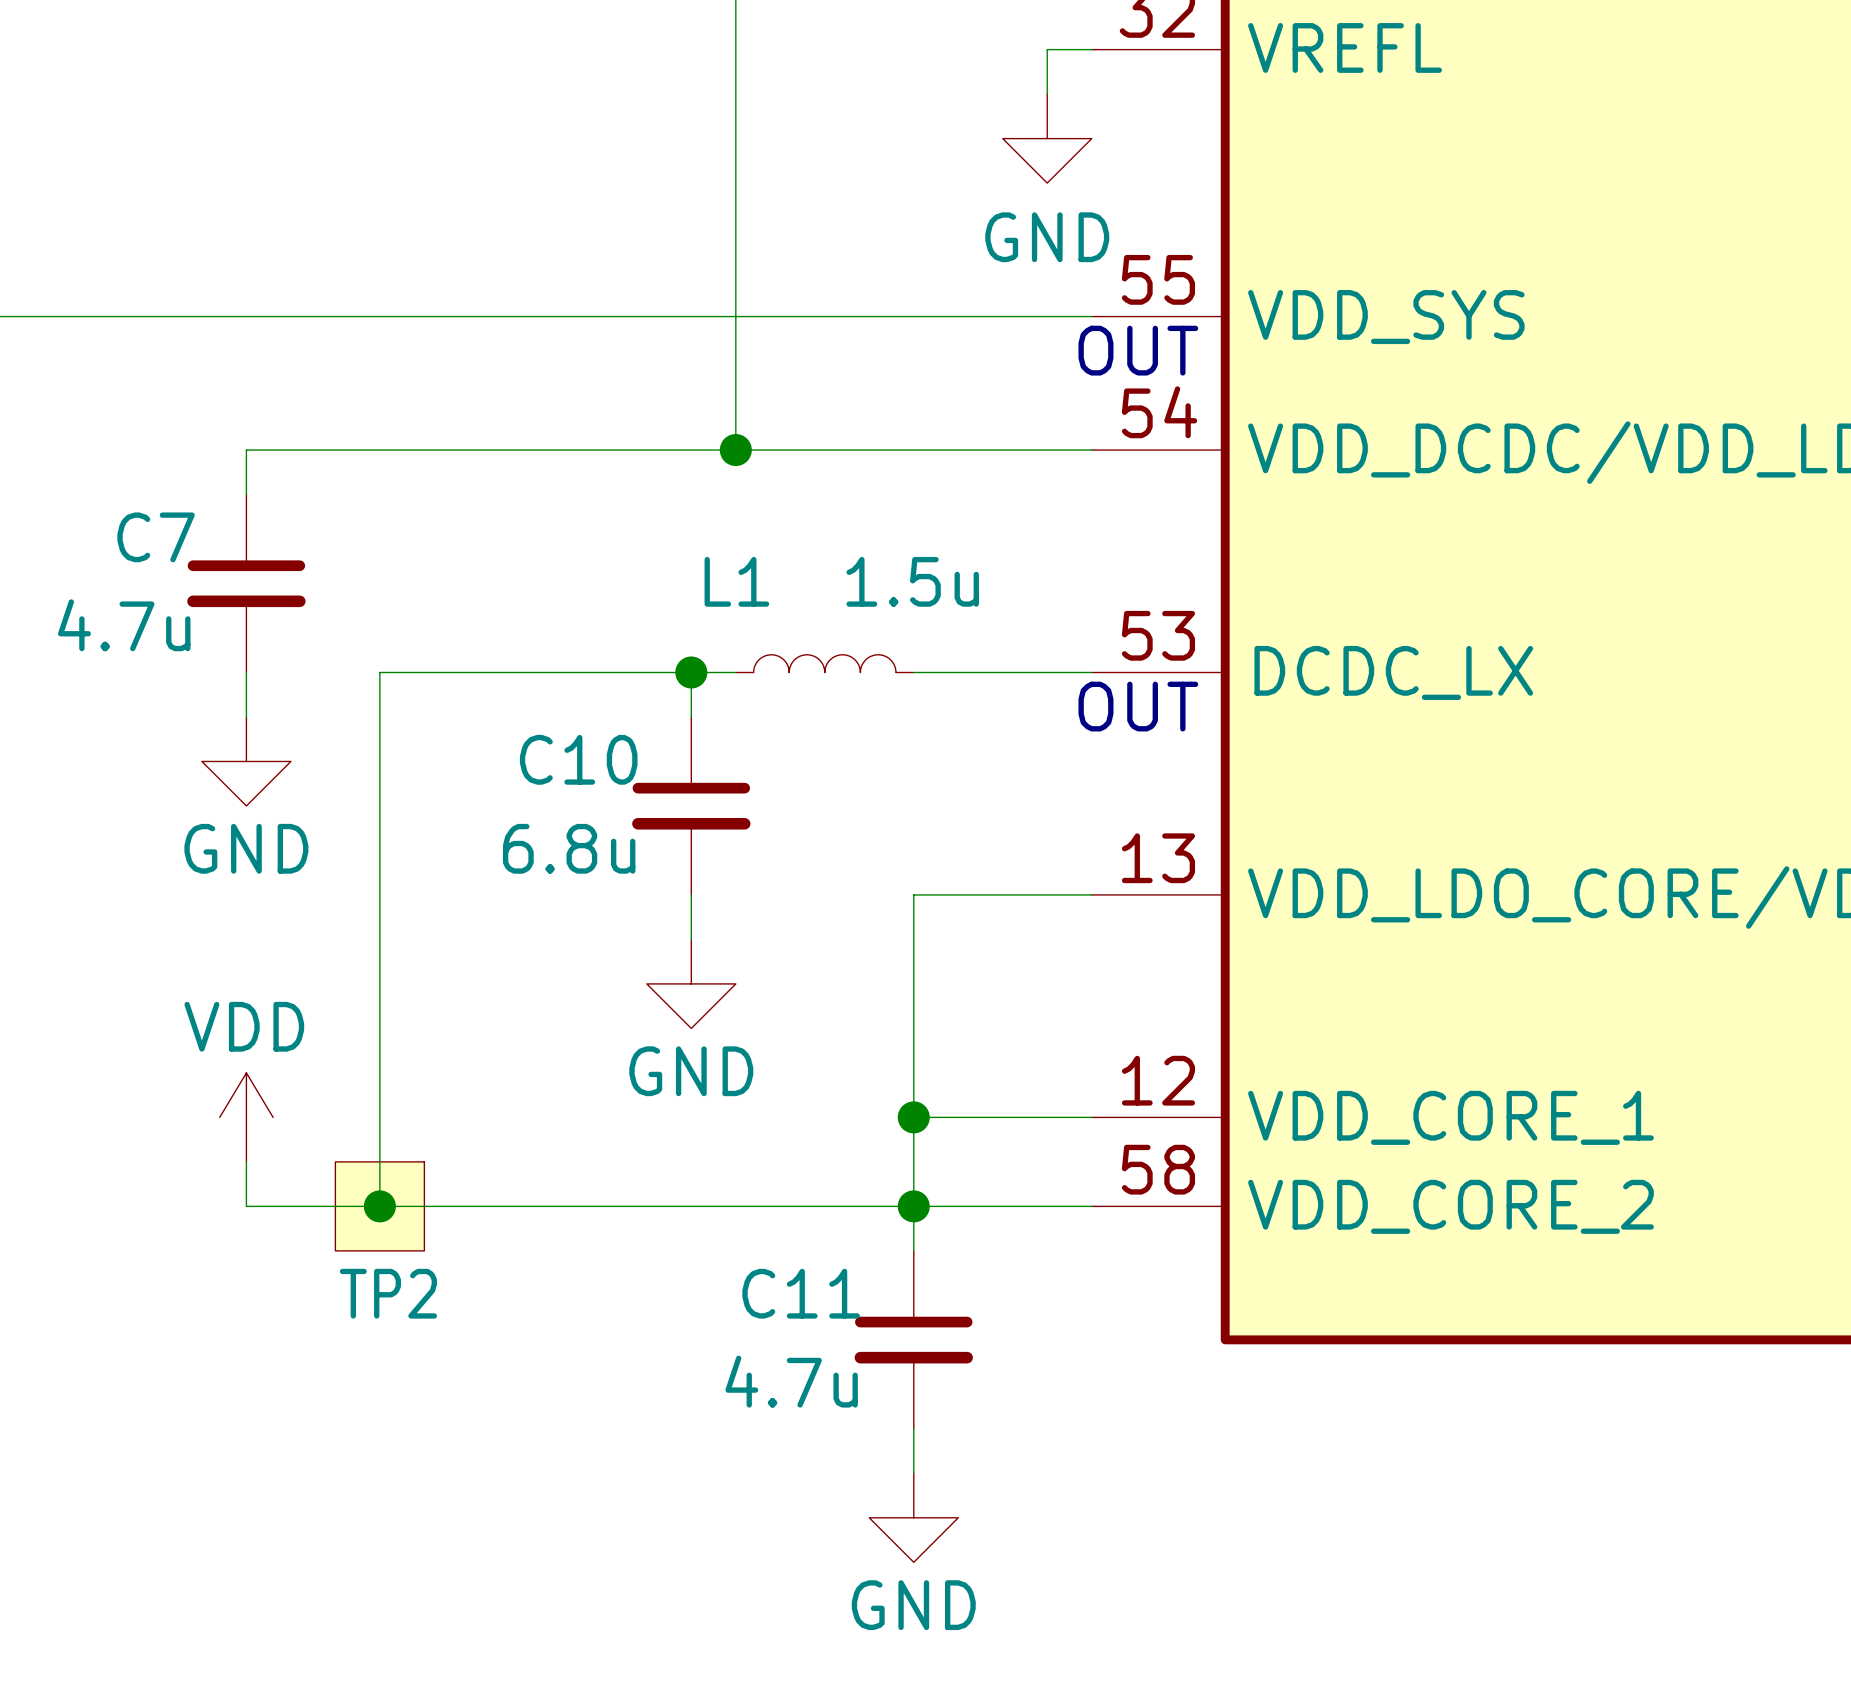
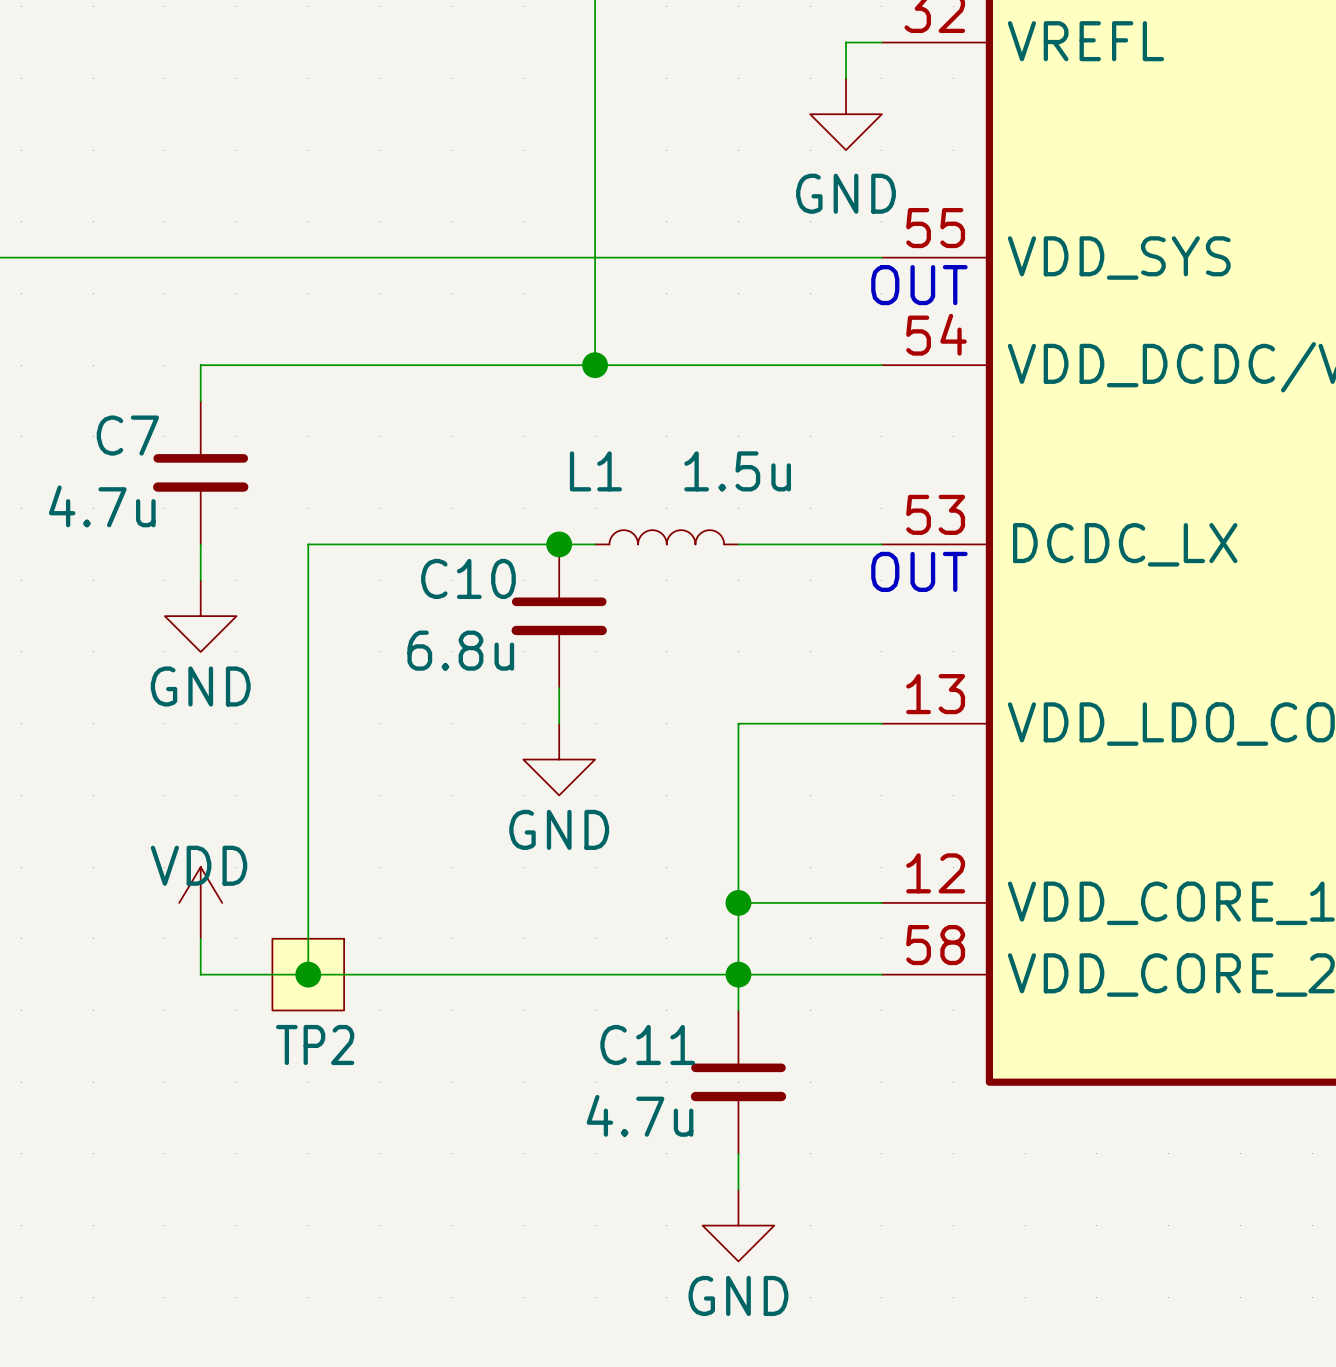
C10 position: (691, 805) -> (559, 616)
power symbol position: GND (691, 983) -> GND (559, 759)
power symbol text position: VDD (244, 1026) -> VDD (199, 865)

